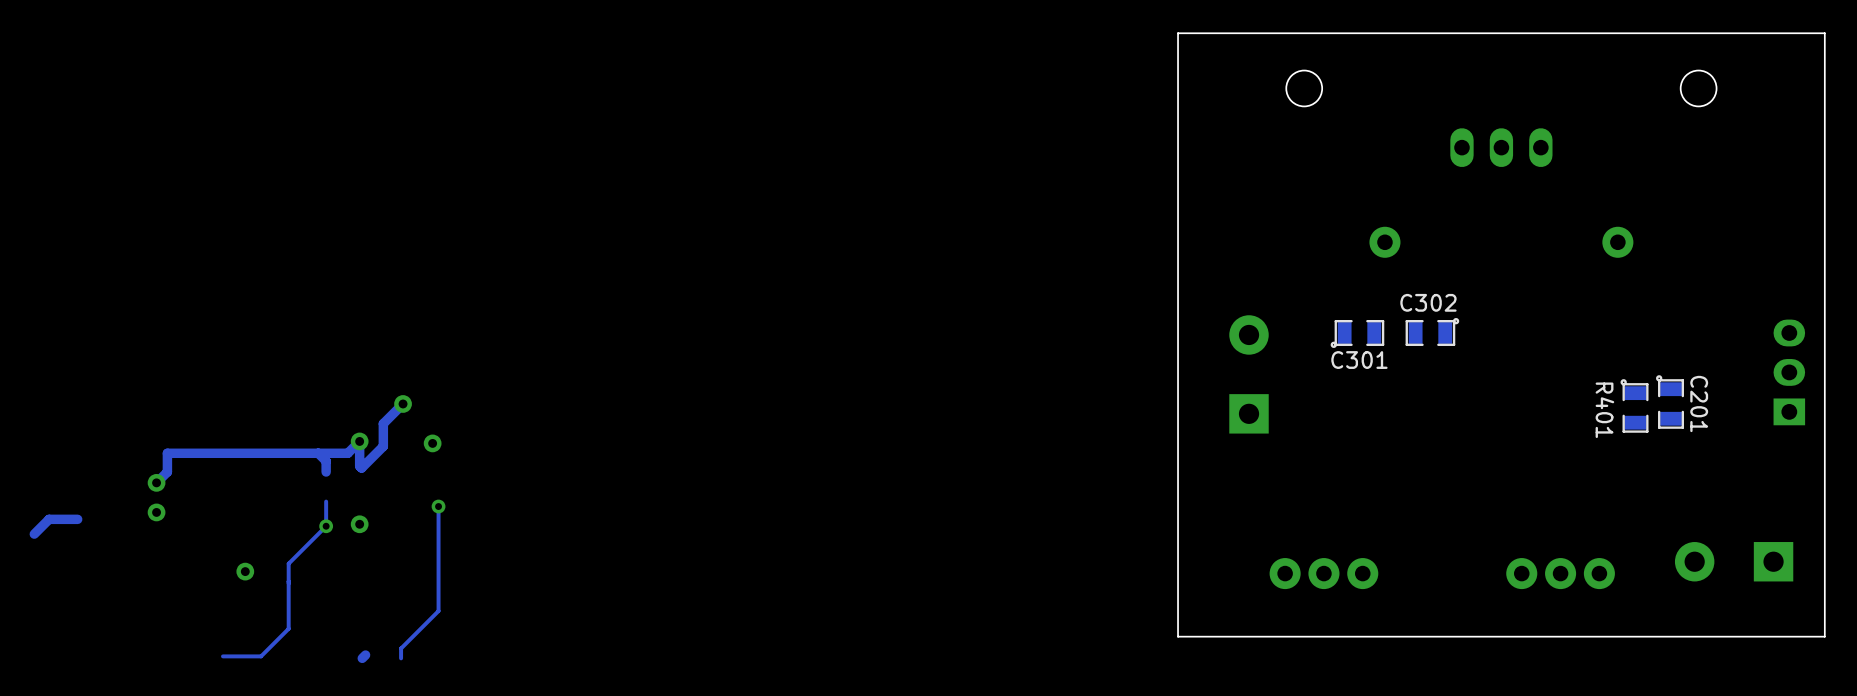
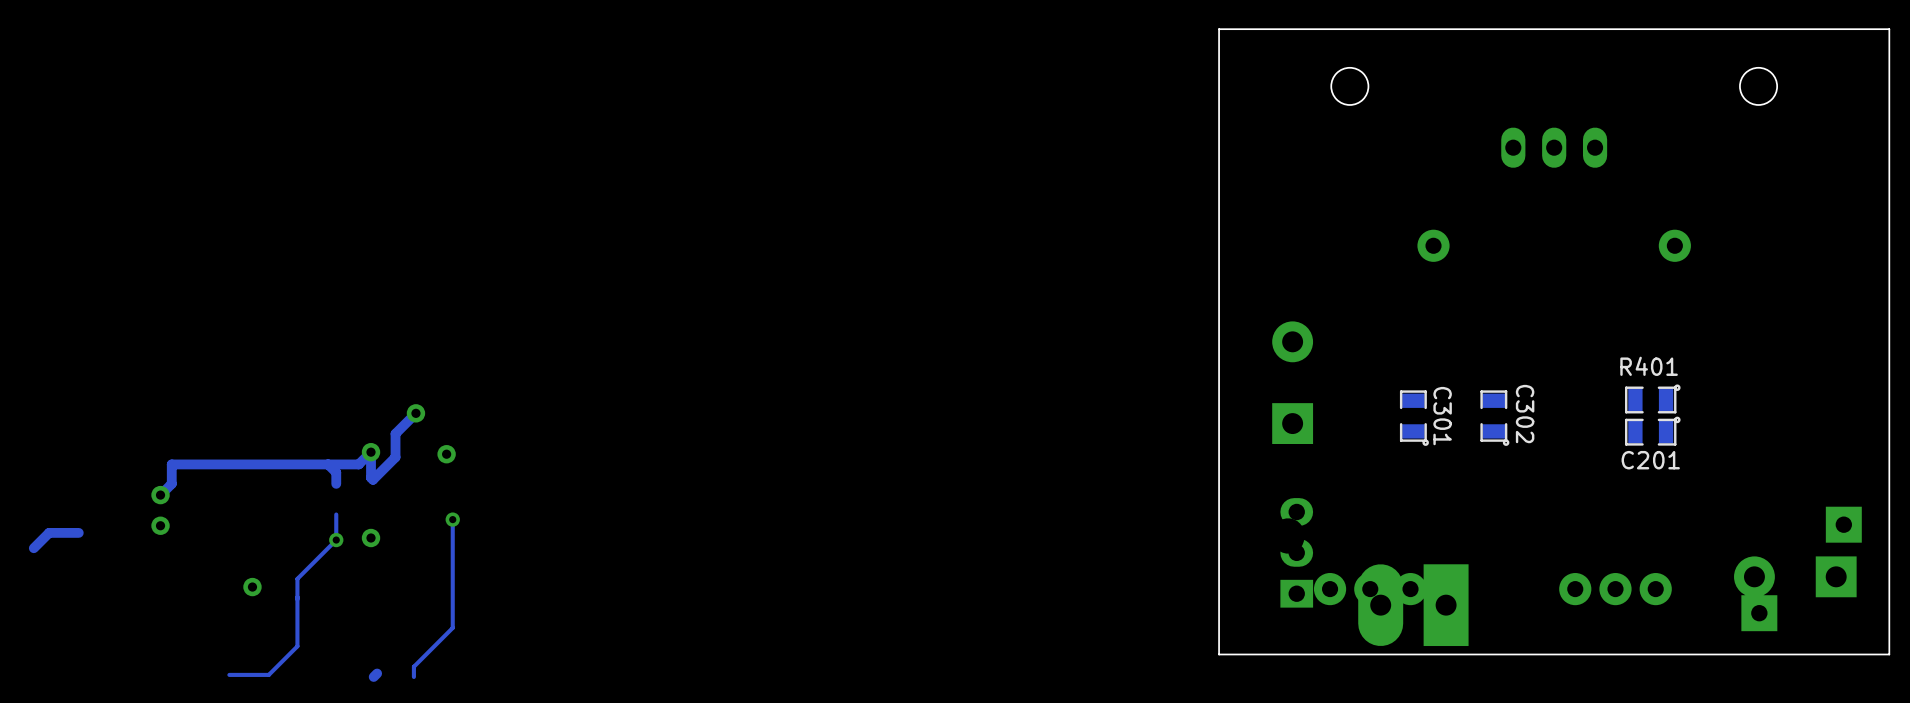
C302 rotation: 0° (1432, 332) -> 90° clockwise (1494, 418)
C302 position: (1432, 332) -> (1494, 418)
C301 rotation: 0° (1357, 333) -> 90° counterclockwise (1414, 418)
C301 position: (1357, 333) -> (1414, 418)
part: (1789, 372) -> none
C201 rotation: 0° (1670, 402) -> 90° clockwise (1652, 431)
C201 position: (1670, 402) -> (1652, 431)
R401 rotation: 0° (1634, 405) -> 90° clockwise (1652, 398)
R401 position: (1634, 405) -> (1652, 398)
part: none -> (1843, 524)
part: none -> (1296, 552)
part: none -> (1413, 605)
part: none -> (1759, 613)

